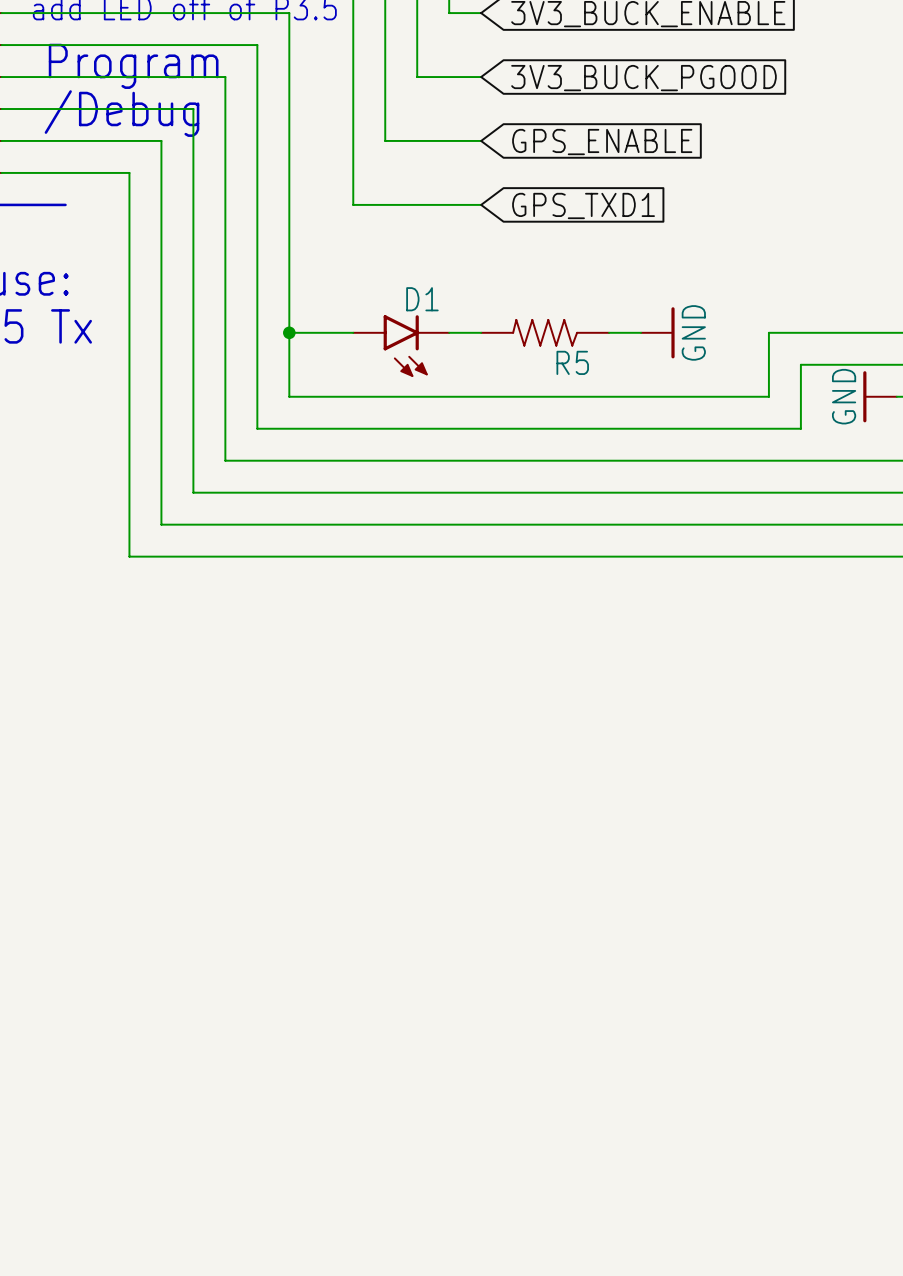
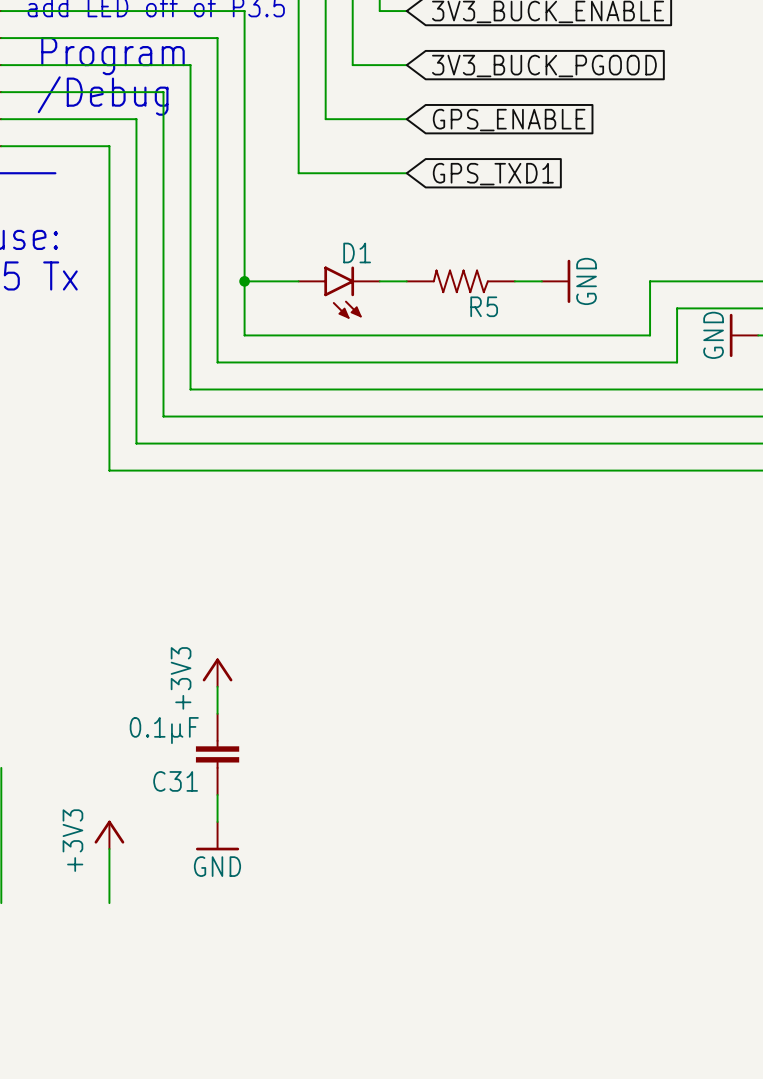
power symbol: none -> +3V3 (217, 672)
wire: none -> (217, 686) (217, 713)
C31: none -> 0.1µF (217, 754)
wire: none -> (1, 767) (1, 903)
wire: none -> (217, 794) (217, 821)
power symbol: none -> +3V3 (109, 834)
power symbol: none -> GND (217, 836)
wire: none -> (109, 849) (109, 903)

